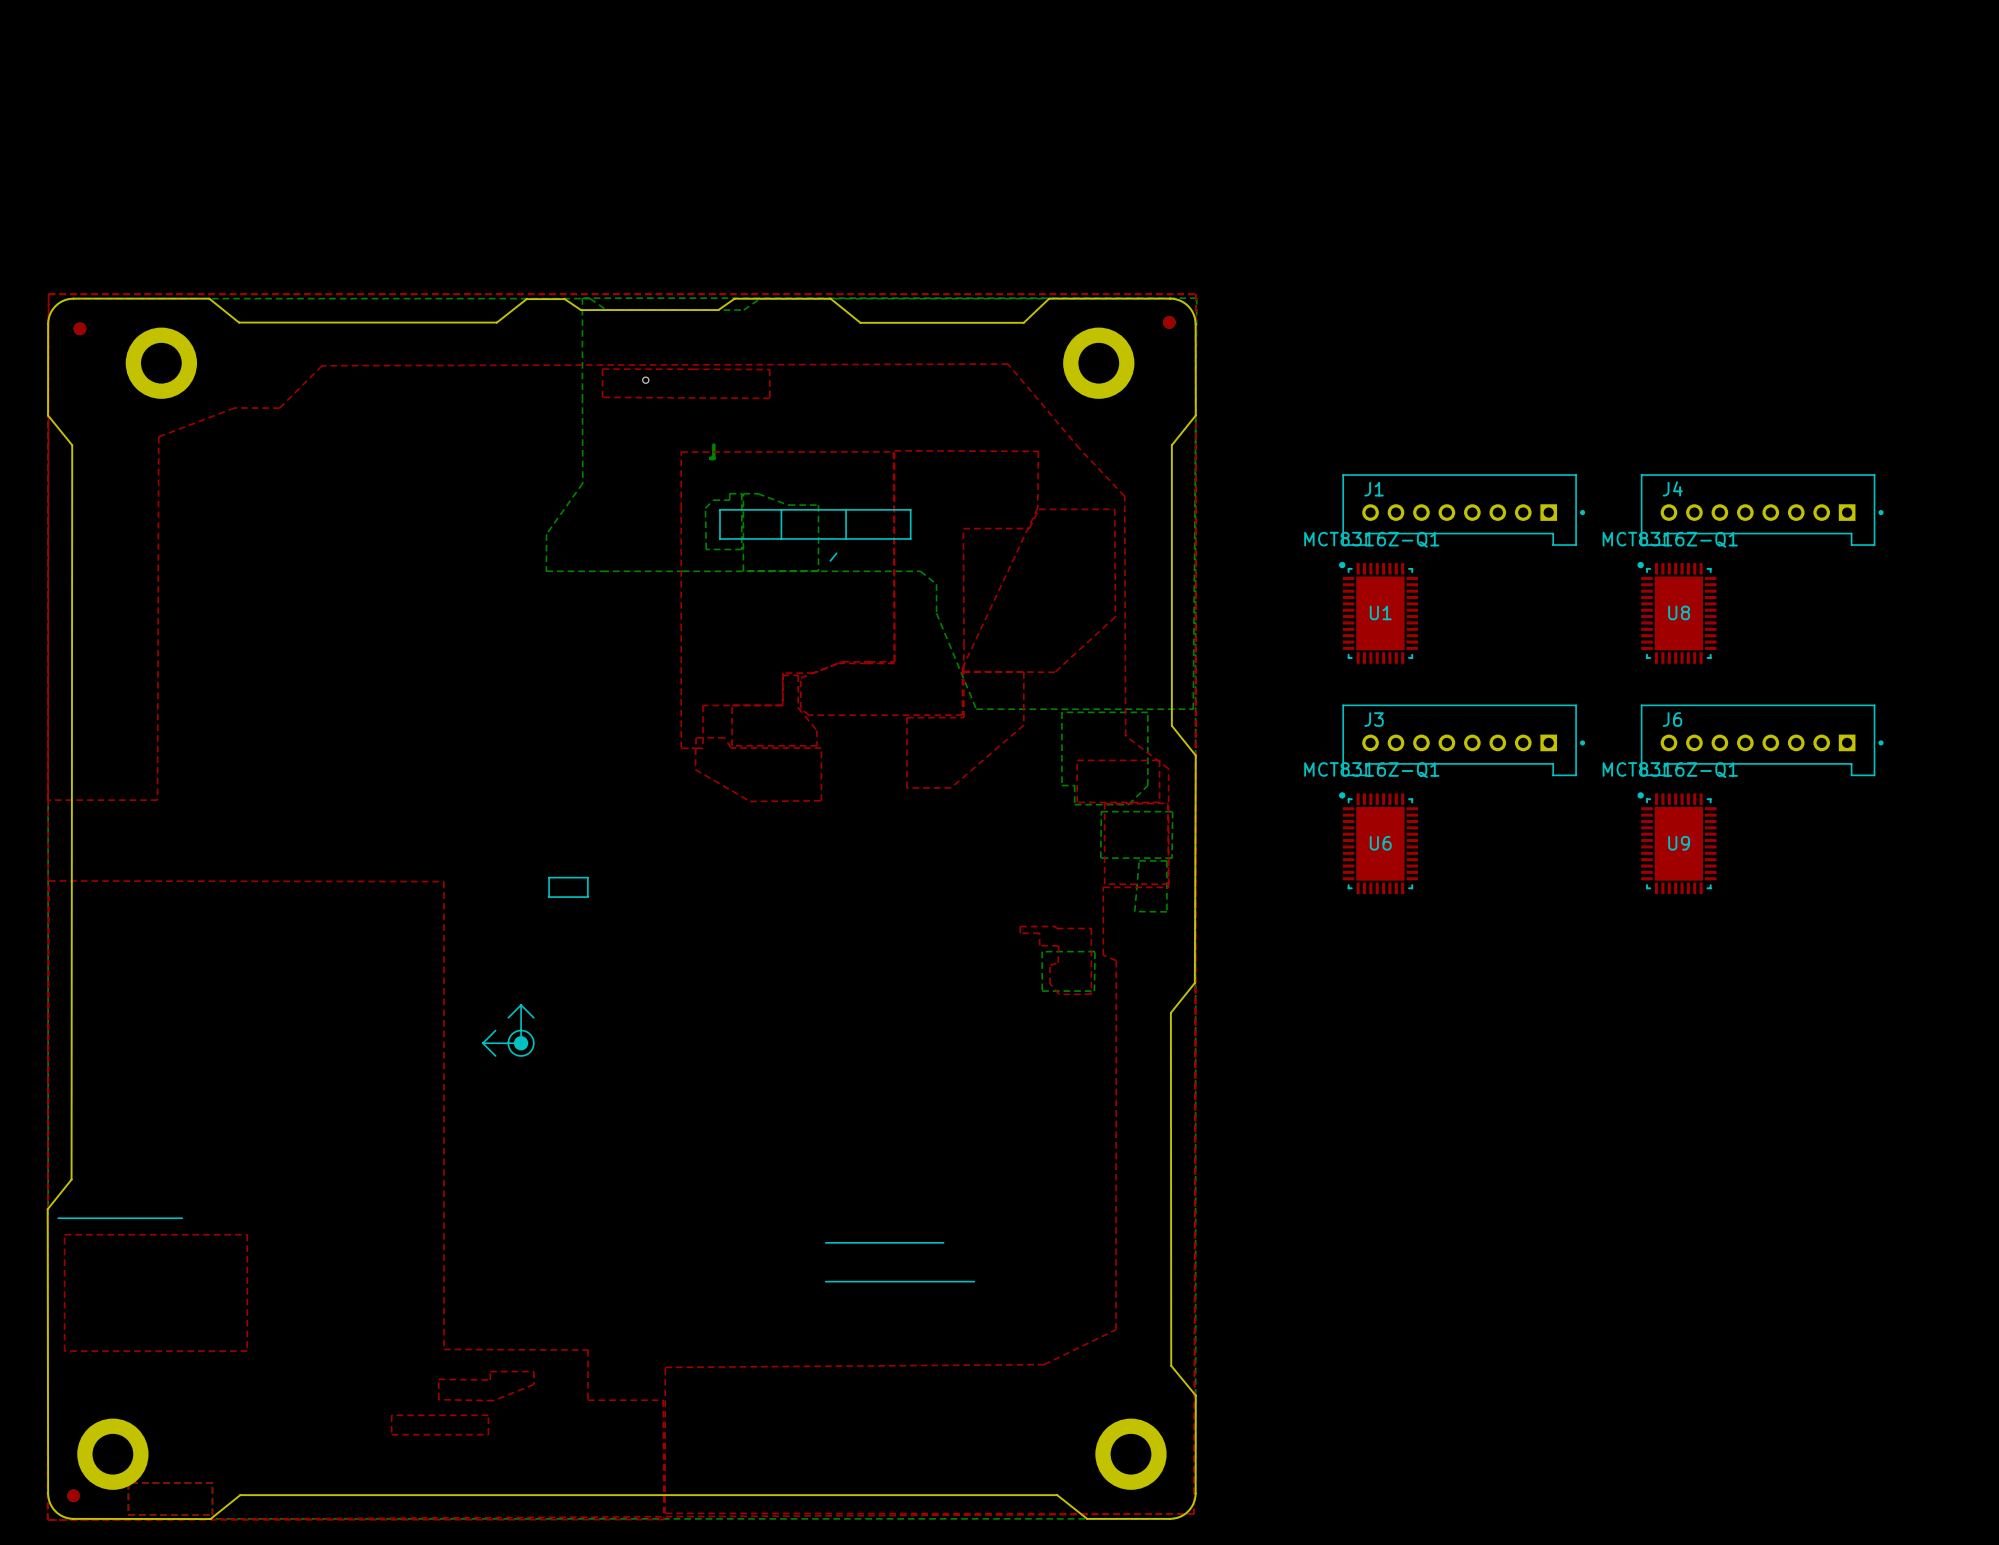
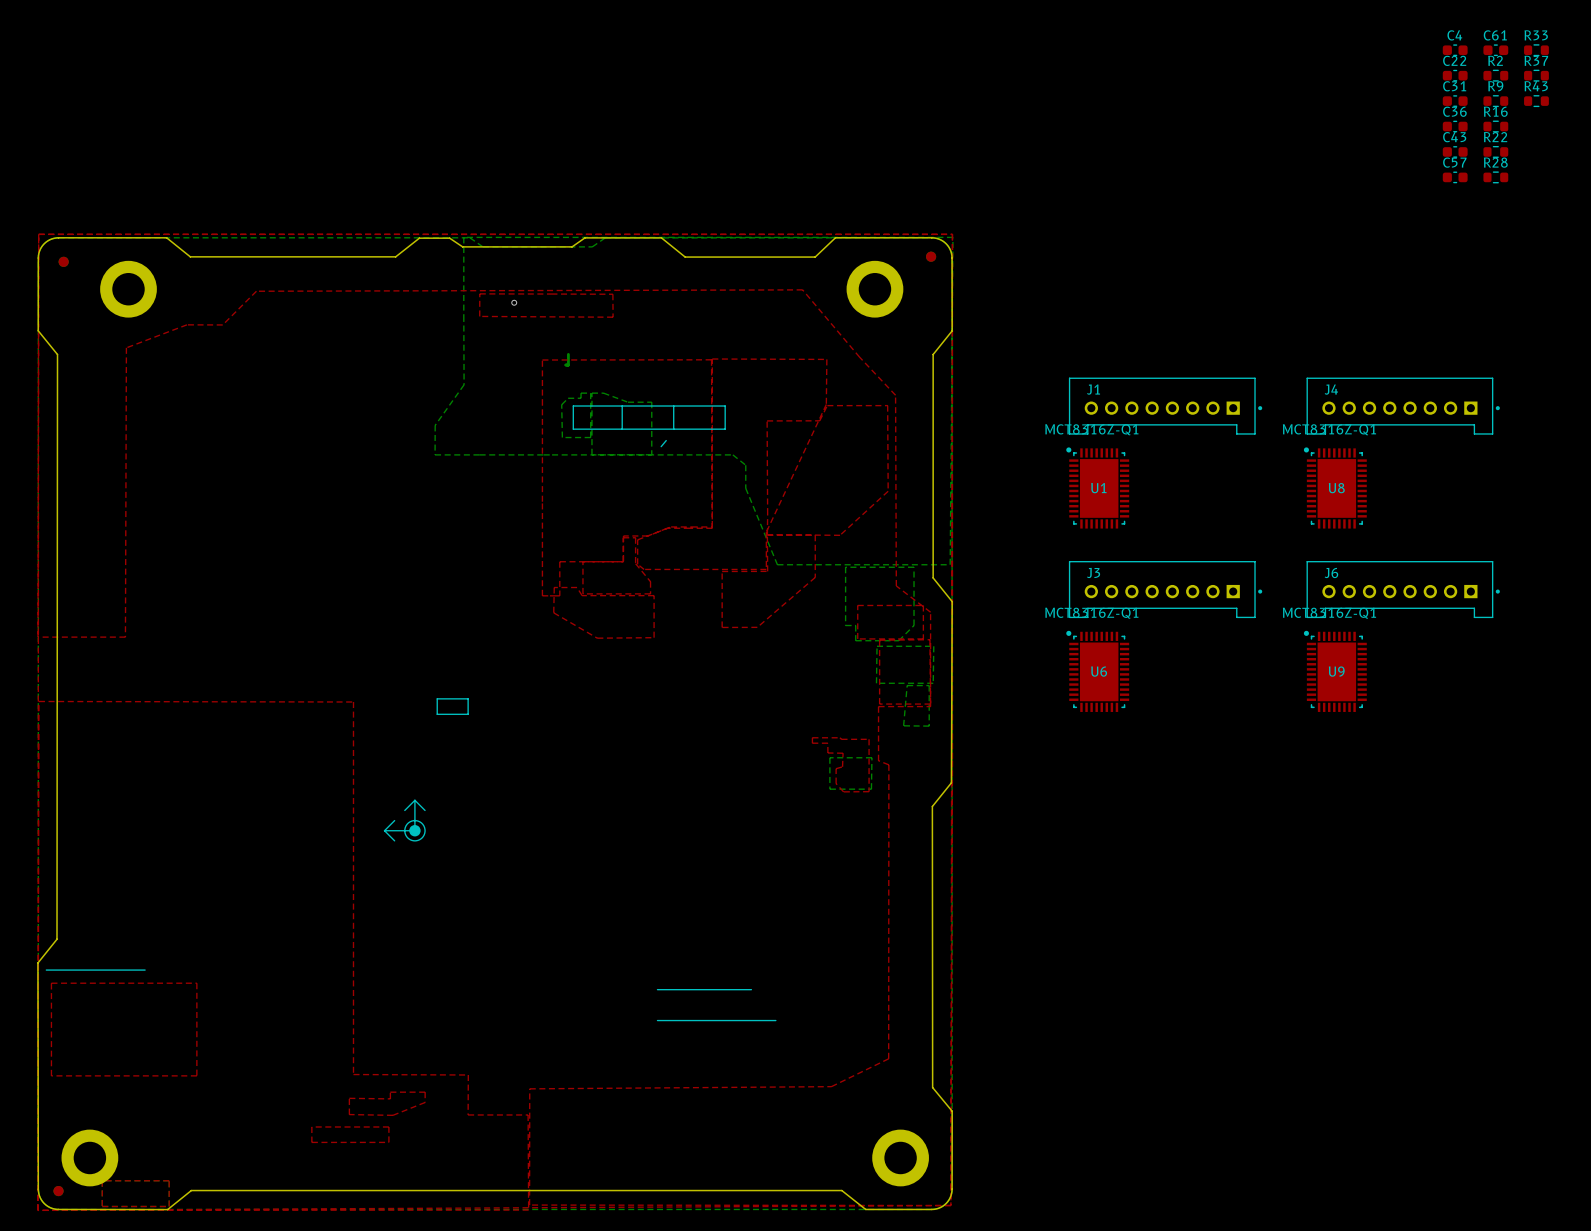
C4: none -> (1455, 50)
C61: none -> (1495, 50)
R33: none -> (1536, 50)
C22: none -> (1455, 75)
R2: none -> (1495, 75)
R37: none -> (1536, 75)
C31: none -> (1455, 101)
R9: none -> (1495, 101)
R43: none -> (1536, 101)
C36: none -> (1455, 126)
R16: none -> (1495, 126)
C43: none -> (1455, 151)
R22: none -> (1495, 151)
C57: none -> (1455, 177)
R28: none -> (1495, 177)

